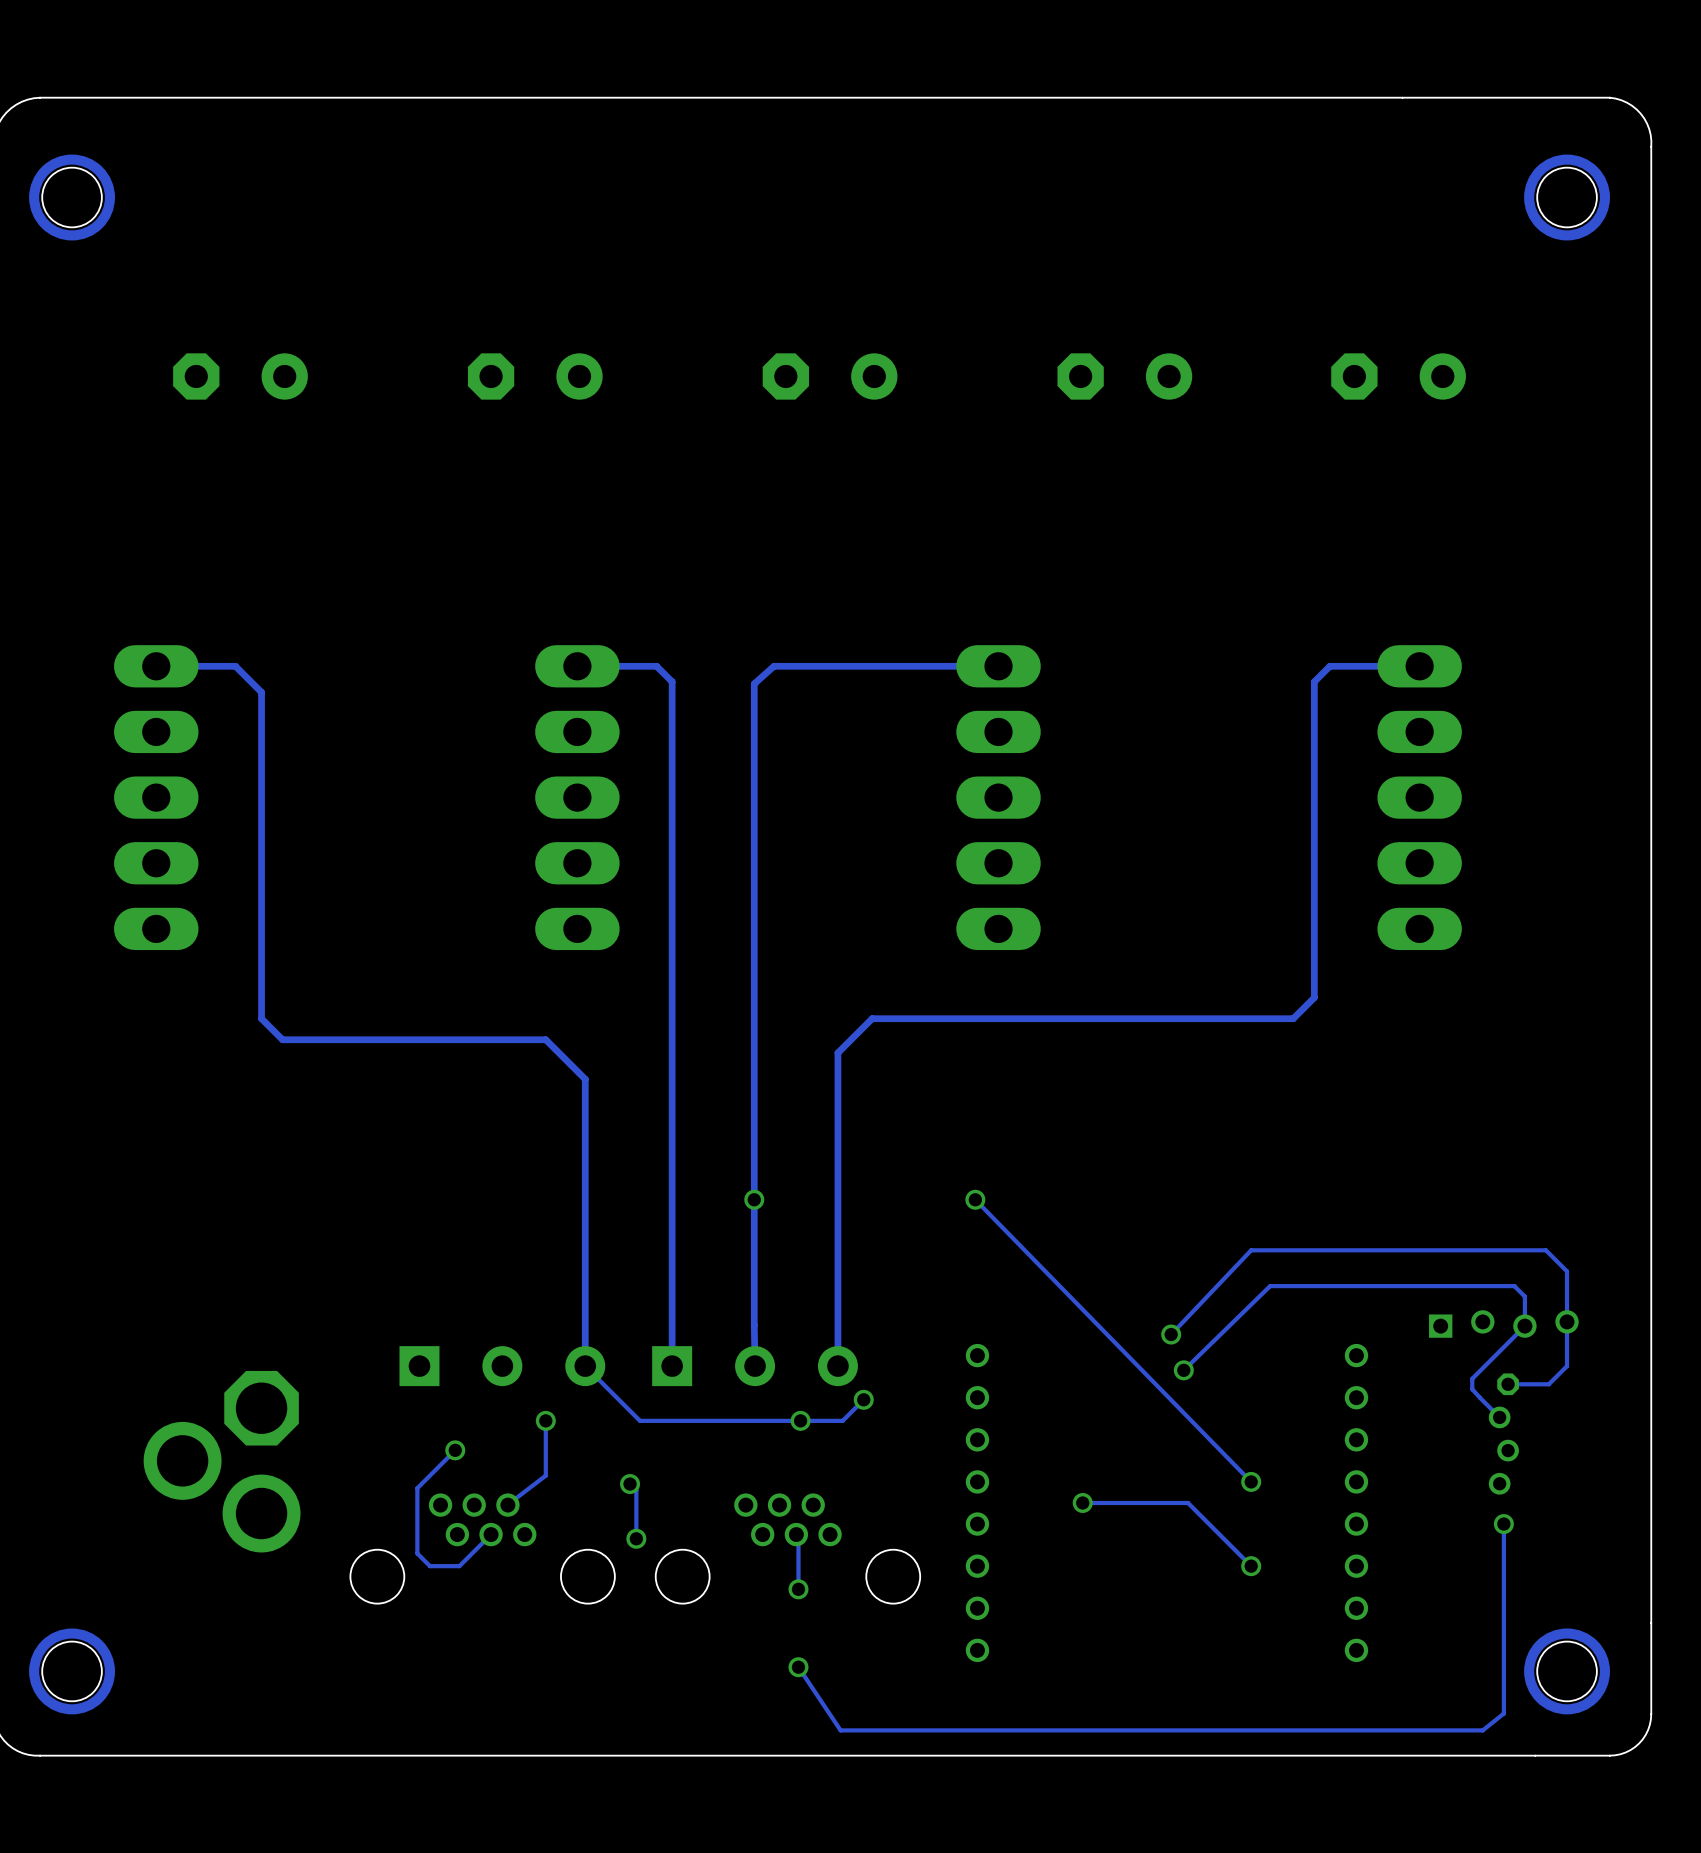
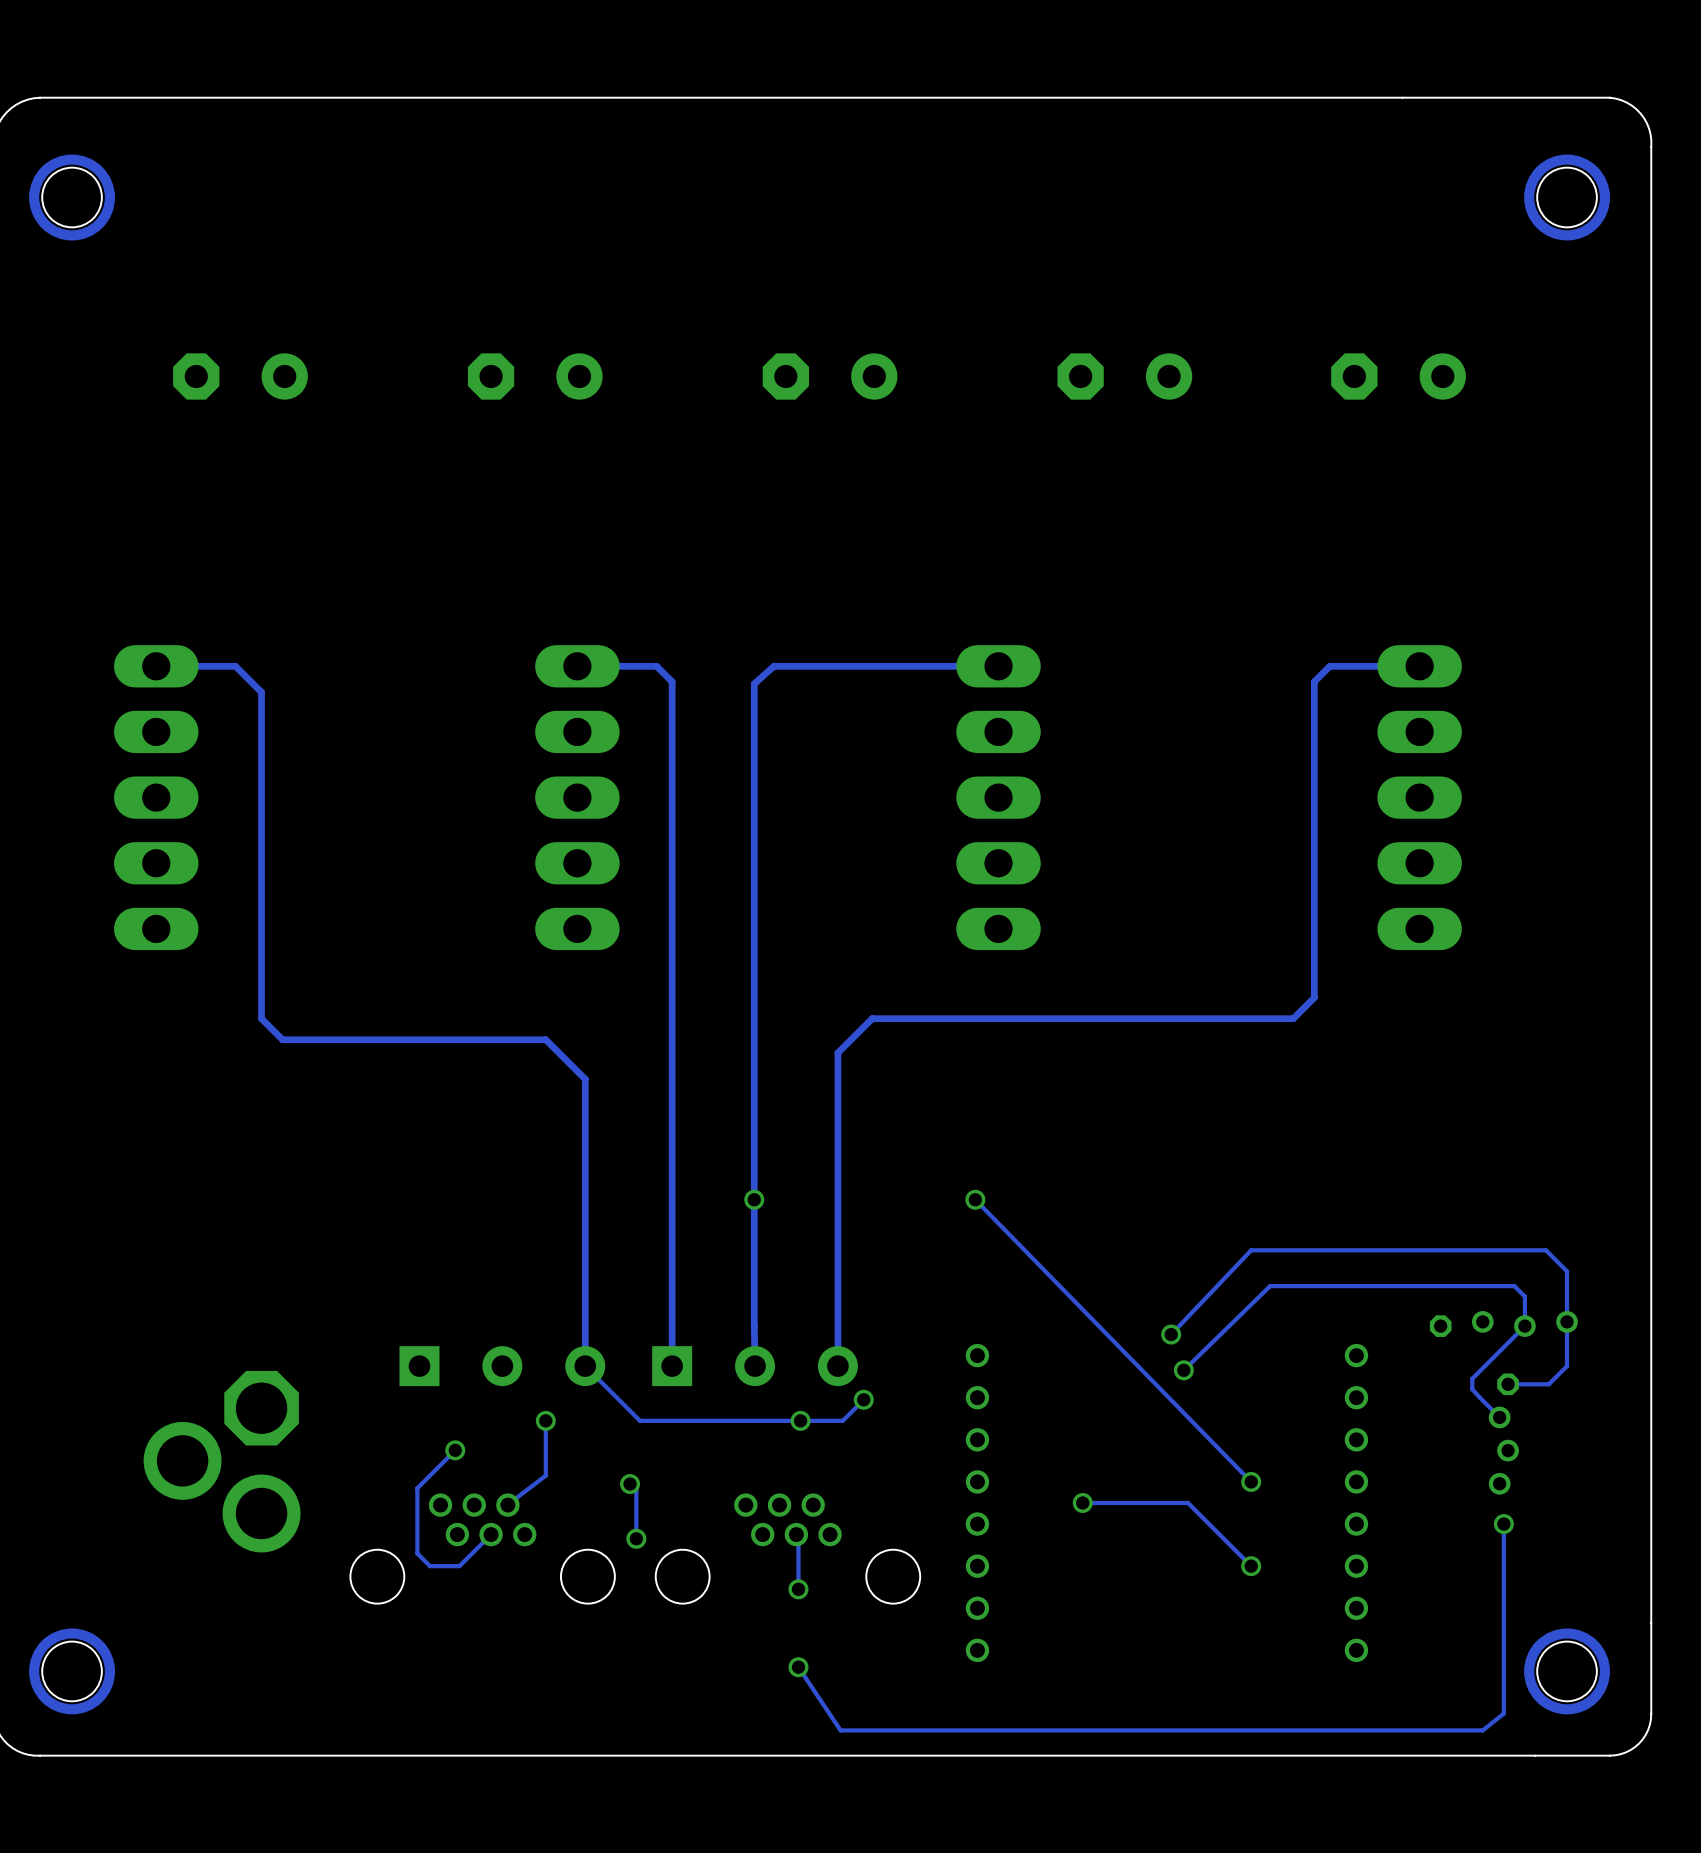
part footprint: [1429, 1310, 1579, 1495] -> [1429, 1311, 1578, 1495]

